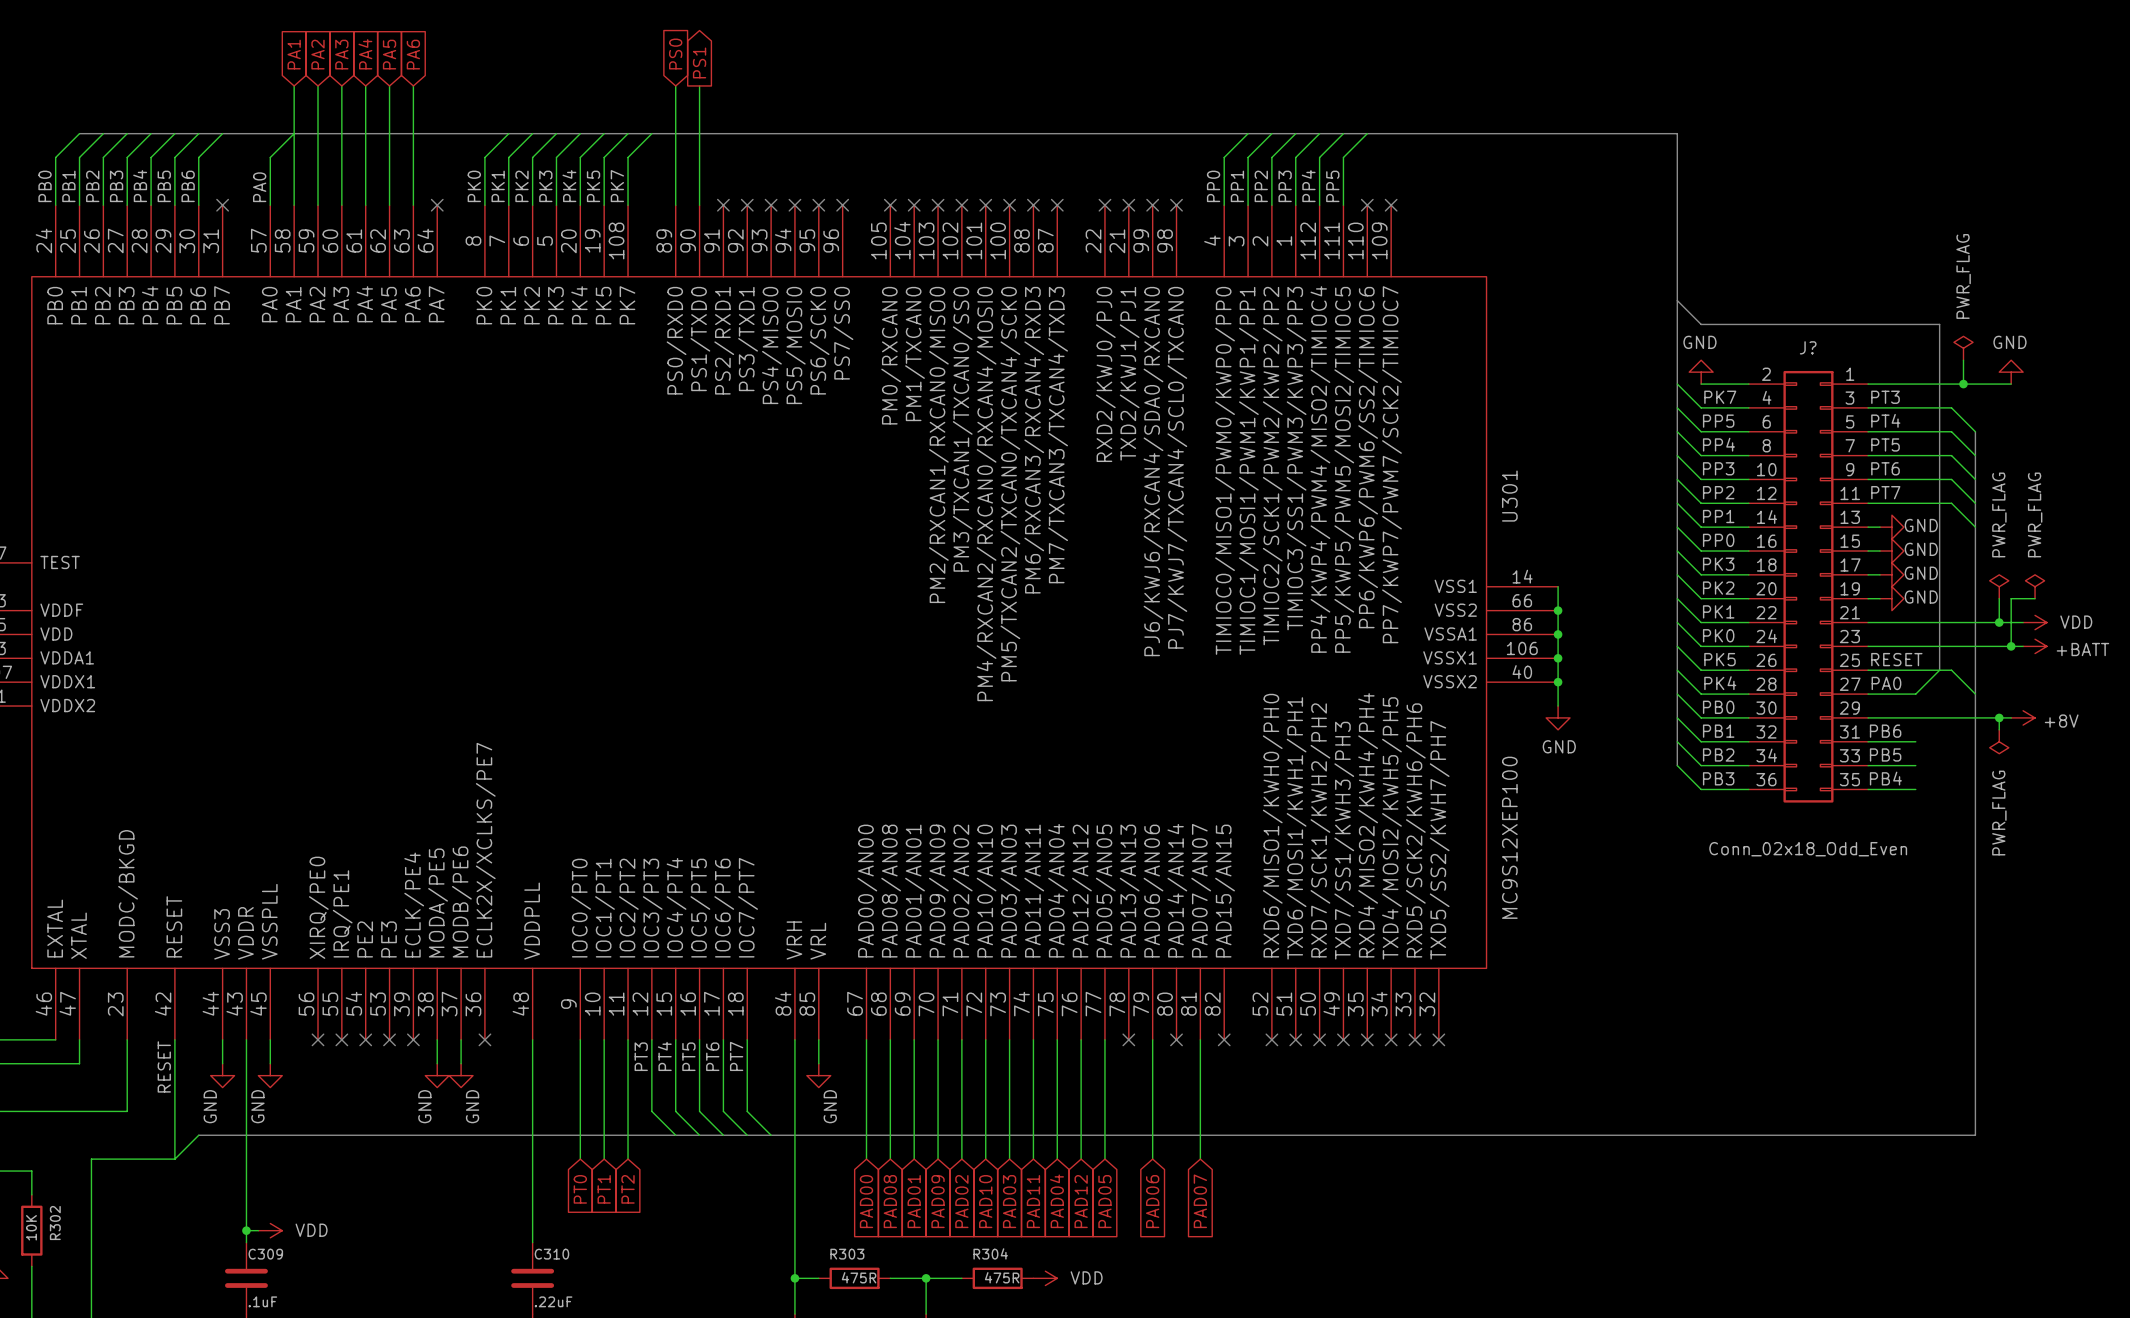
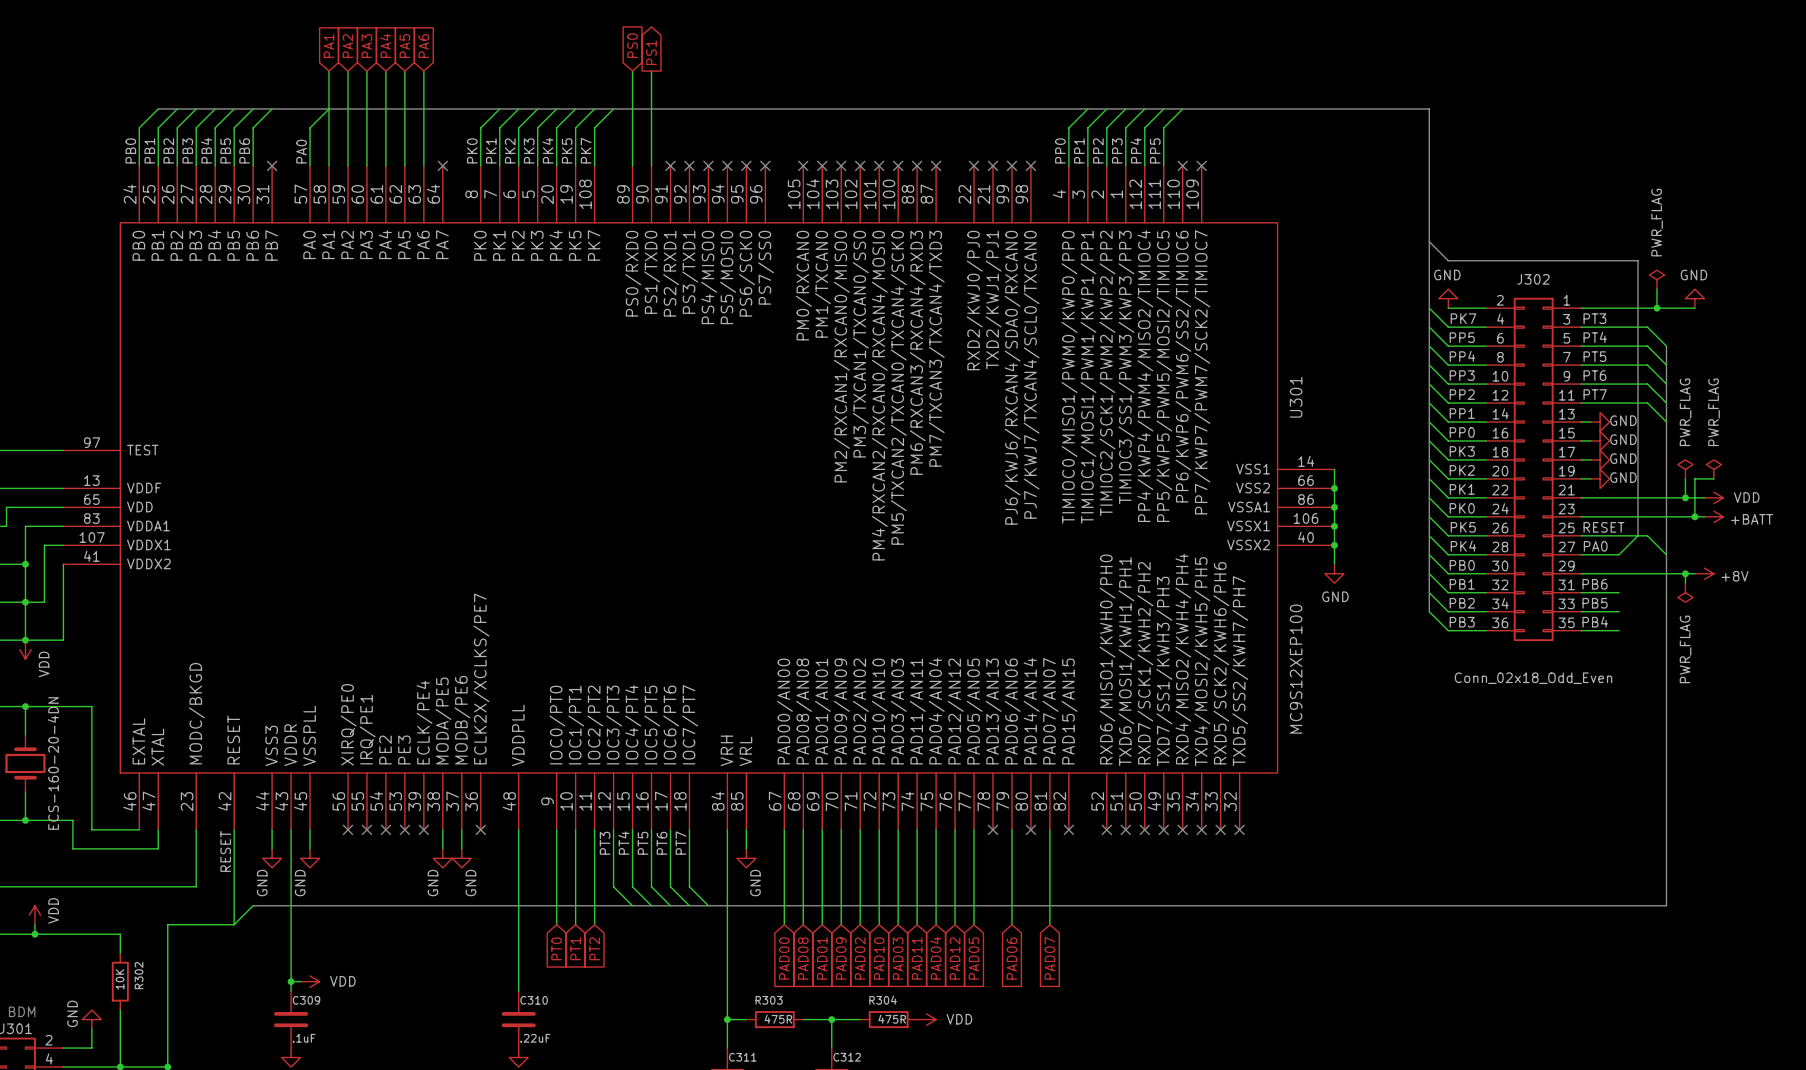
J? name: J? (1808, 347) -> J302 (1533, 279)

